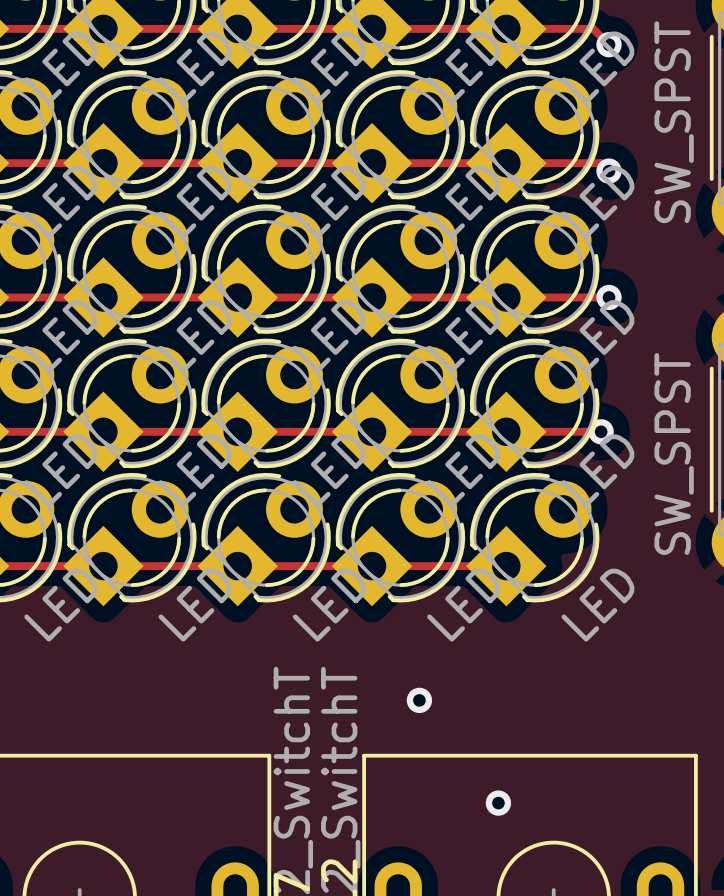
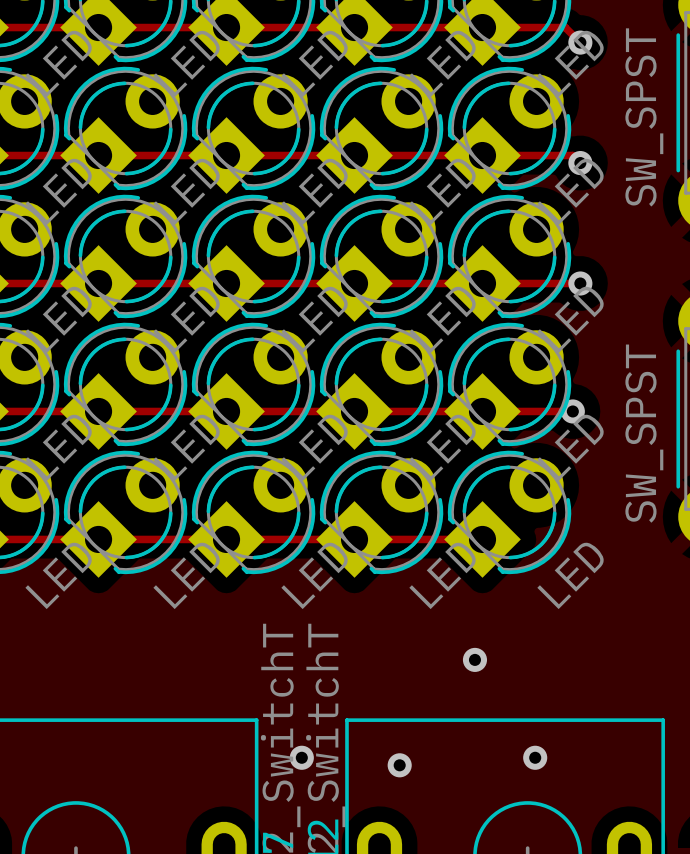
via: none -> (474, 659)
via: (419, 700) -> none
via: none -> (301, 757)
via: none -> (535, 757)
via: none -> (399, 765)
via: (498, 803) -> none

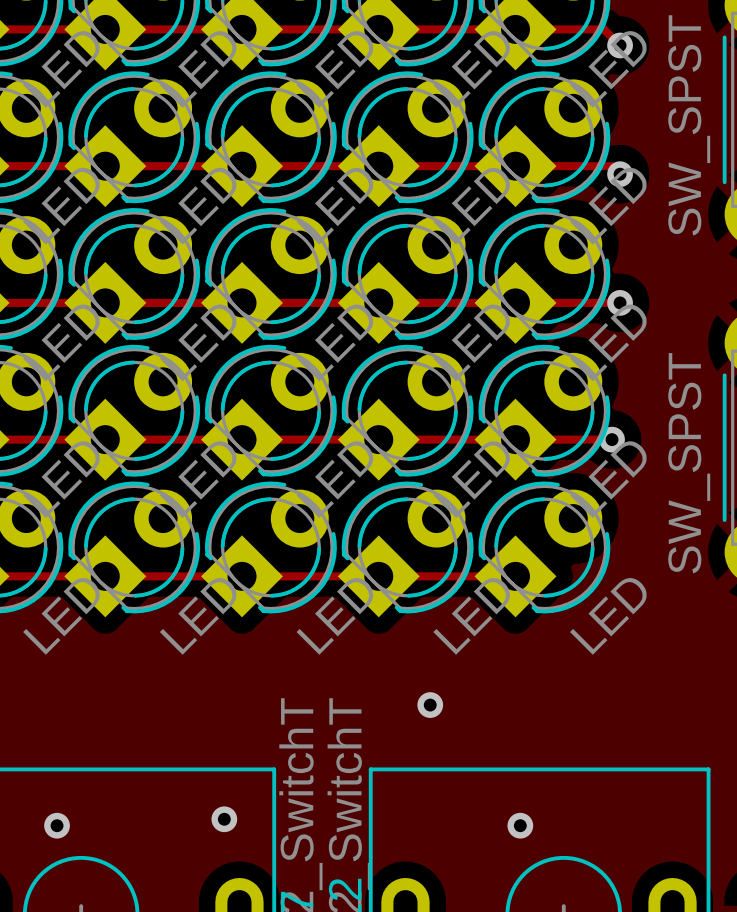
via: none -> (430, 705)
via: (474, 659) -> none
via: (301, 757) -> none
via: (535, 757) -> none
via: (399, 765) -> none
via: none -> (224, 819)
via: none -> (57, 825)
via: none -> (520, 825)

